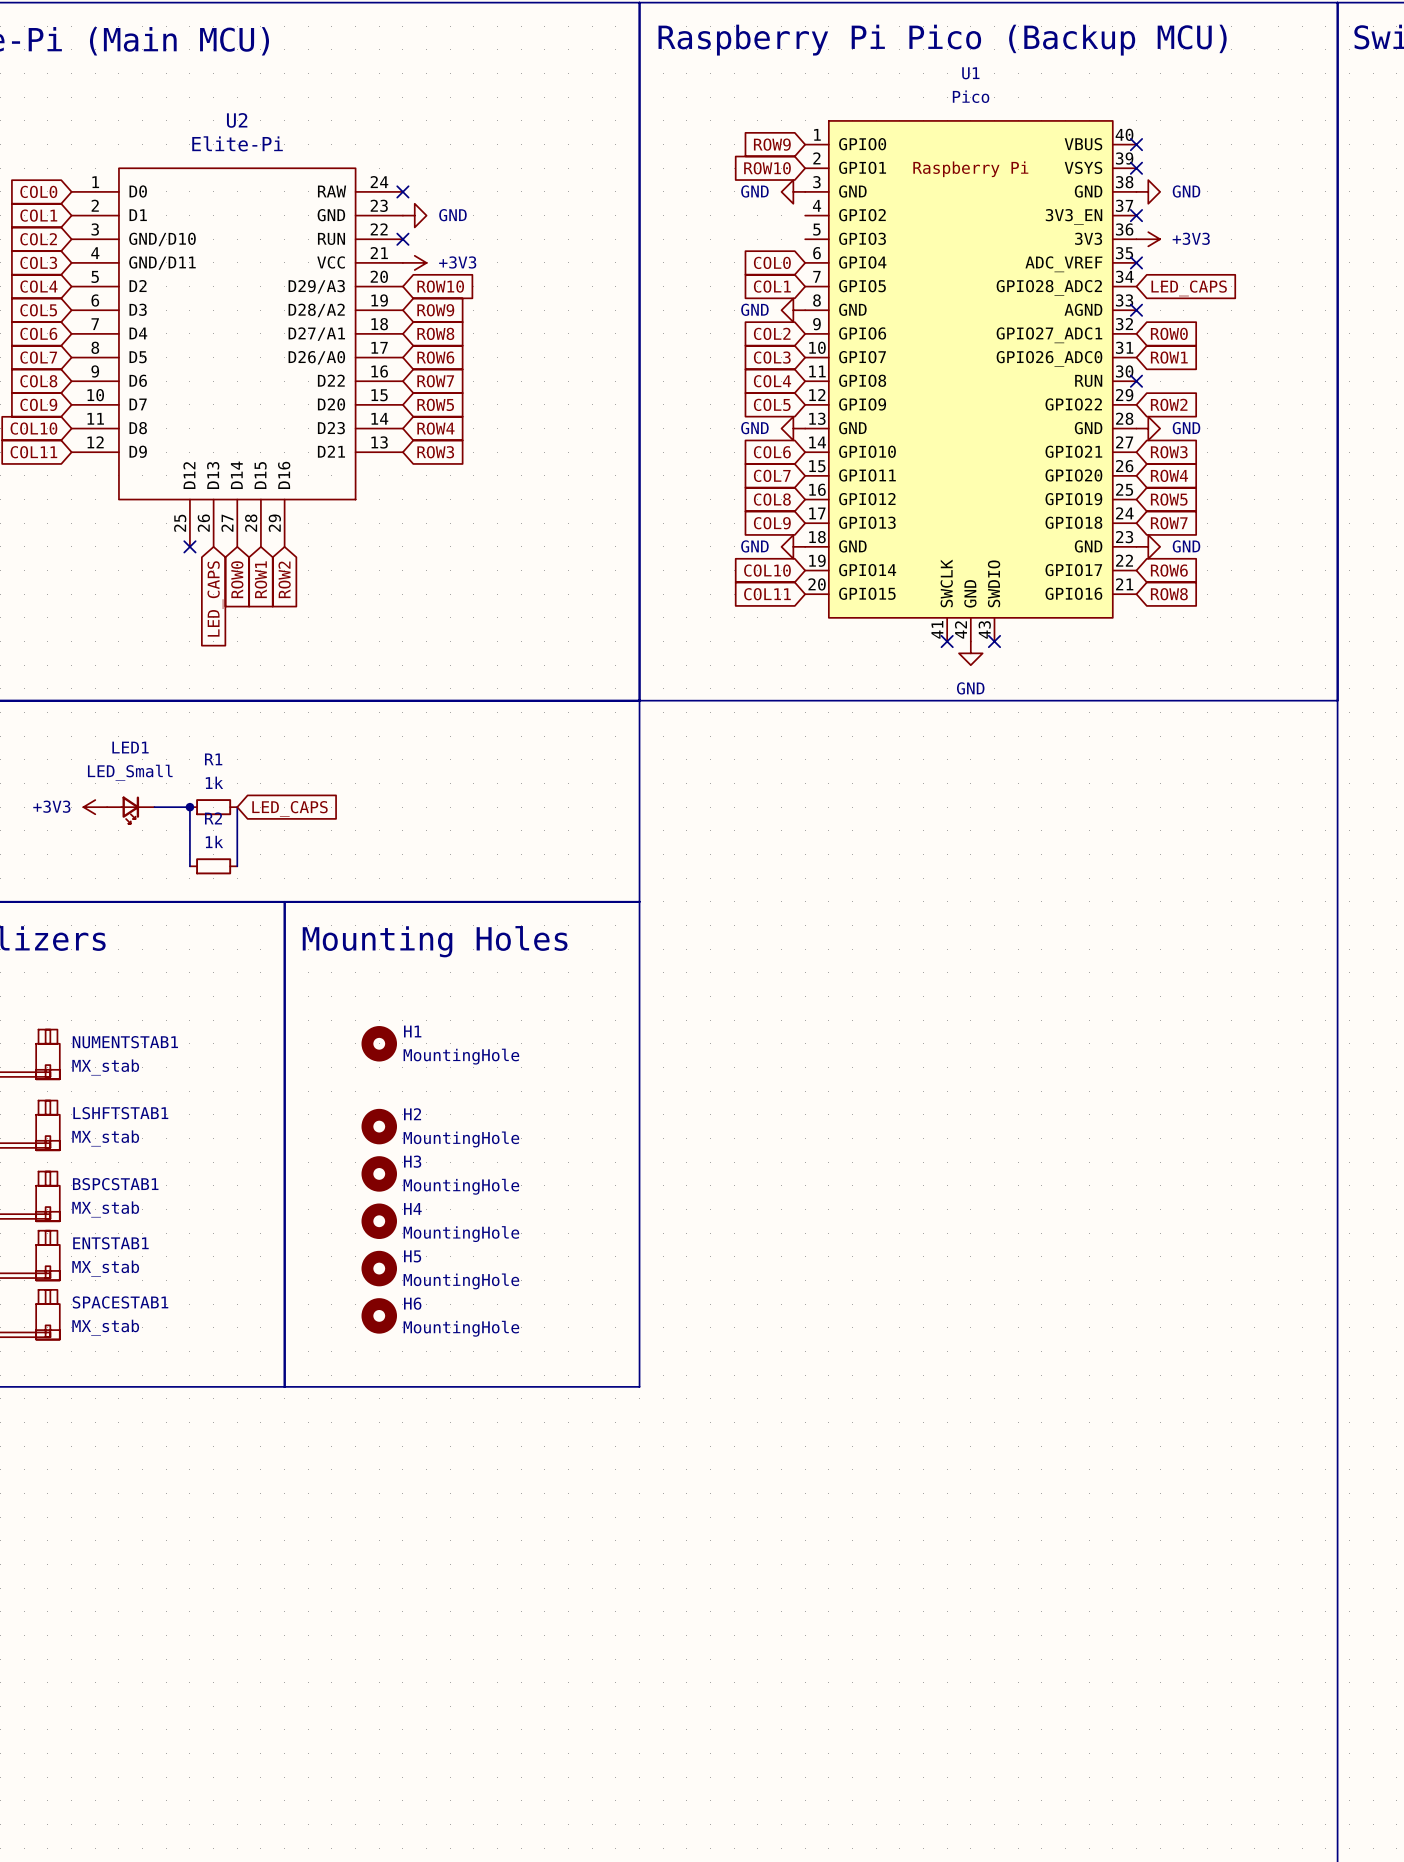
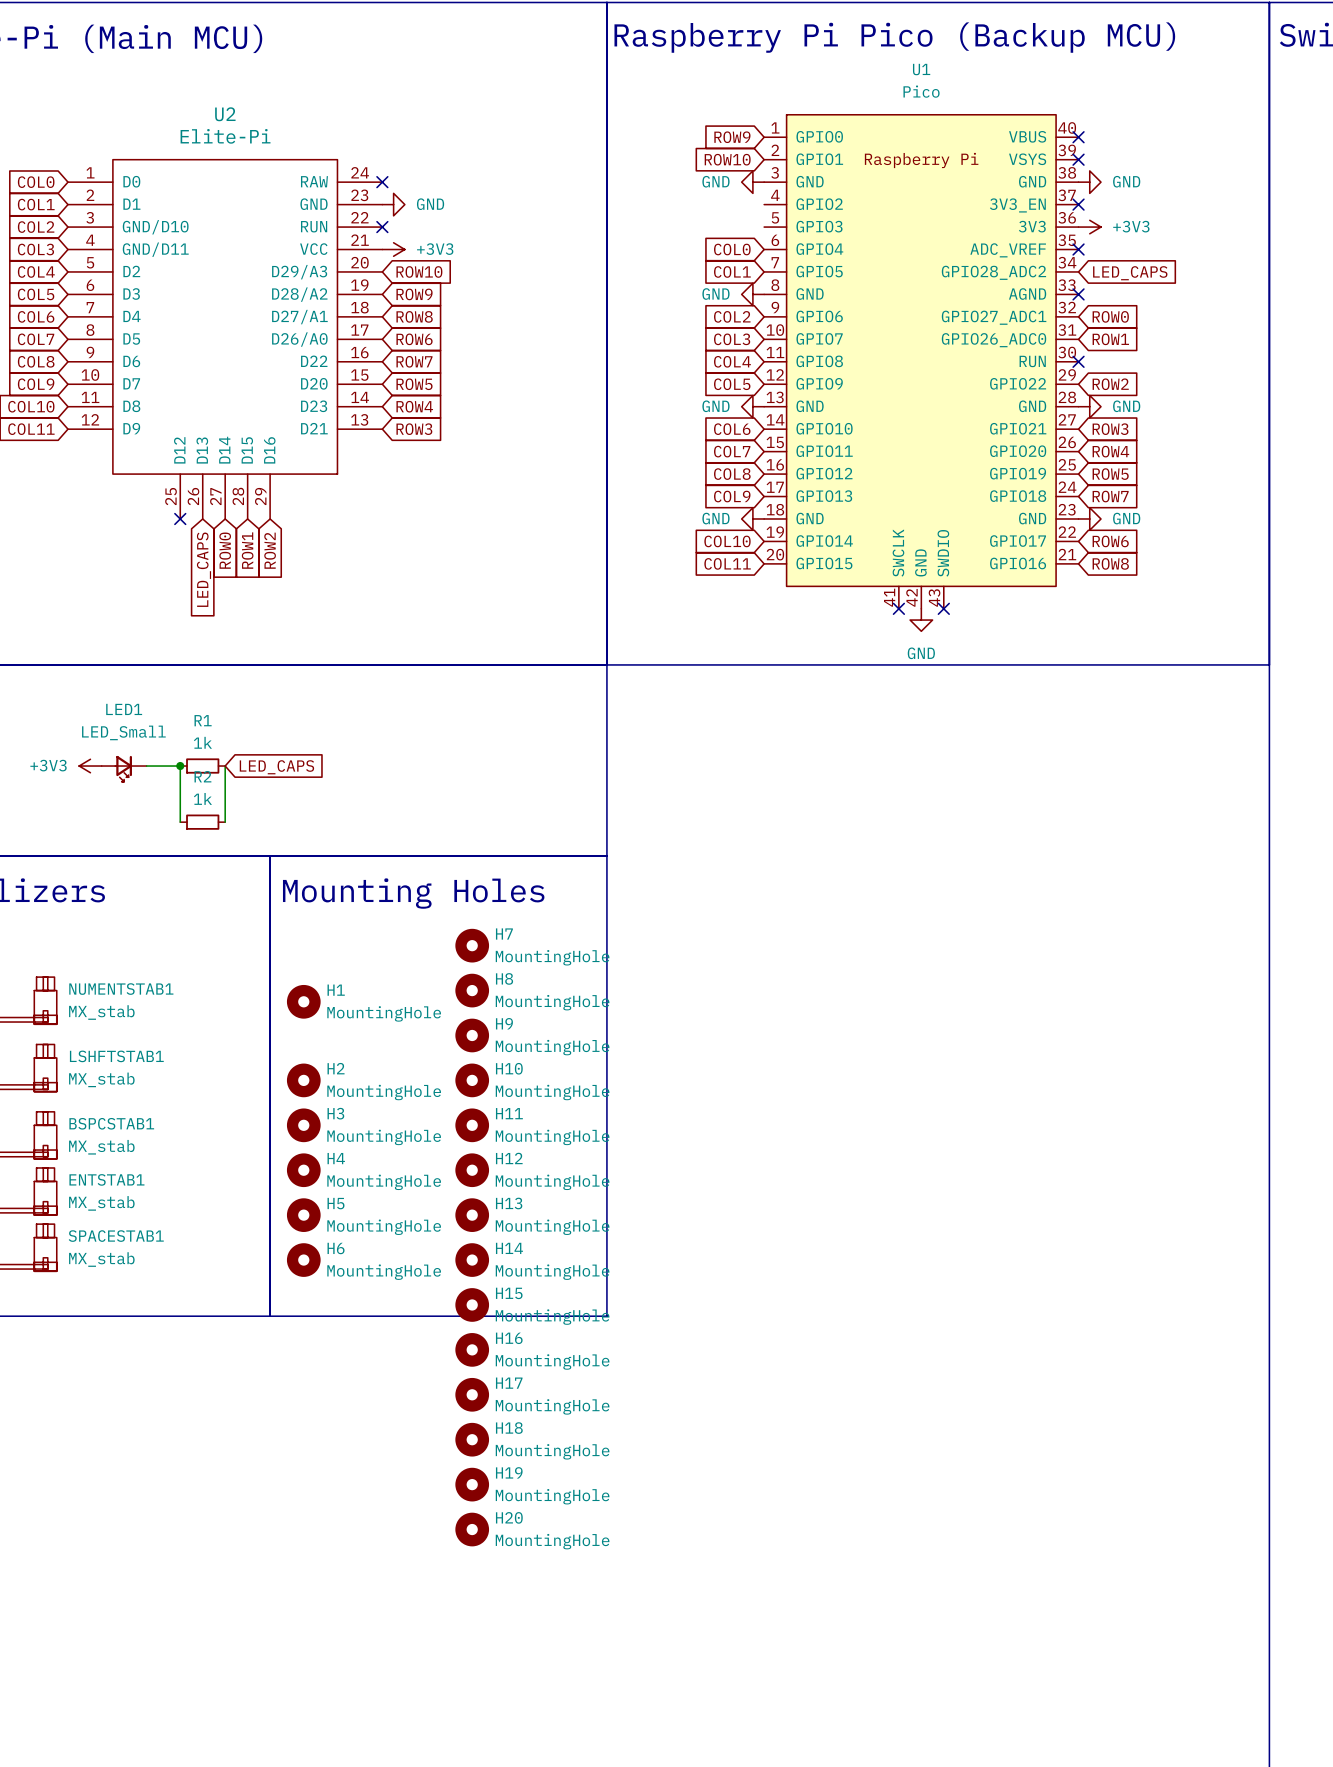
H7: none -> MountingHole (472, 945)
H1 position: (379, 1043) -> (303, 1001)
H8: none -> MountingHole (472, 990)
H9: none -> MountingHole (472, 1035)
H2 position: (379, 1126) -> (303, 1080)
H10: none -> MountingHole (472, 1080)
H3 position: (379, 1173) -> (303, 1125)
H11: none -> MountingHole (472, 1125)
H4 position: (379, 1221) -> (303, 1170)
H12: none -> MountingHole (472, 1170)
H5 position: (379, 1268) -> (303, 1215)
H13: none -> MountingHole (472, 1215)
H6 position: (379, 1315) -> (303, 1260)
H14: none -> MountingHole (472, 1260)
H15: none -> MountingHole (472, 1304)
H16: none -> MountingHole (472, 1349)
H17: none -> MountingHole (472, 1394)
H18: none -> MountingHole (472, 1439)
H19: none -> MountingHole (472, 1484)
H20: none -> MountingHole (472, 1529)

